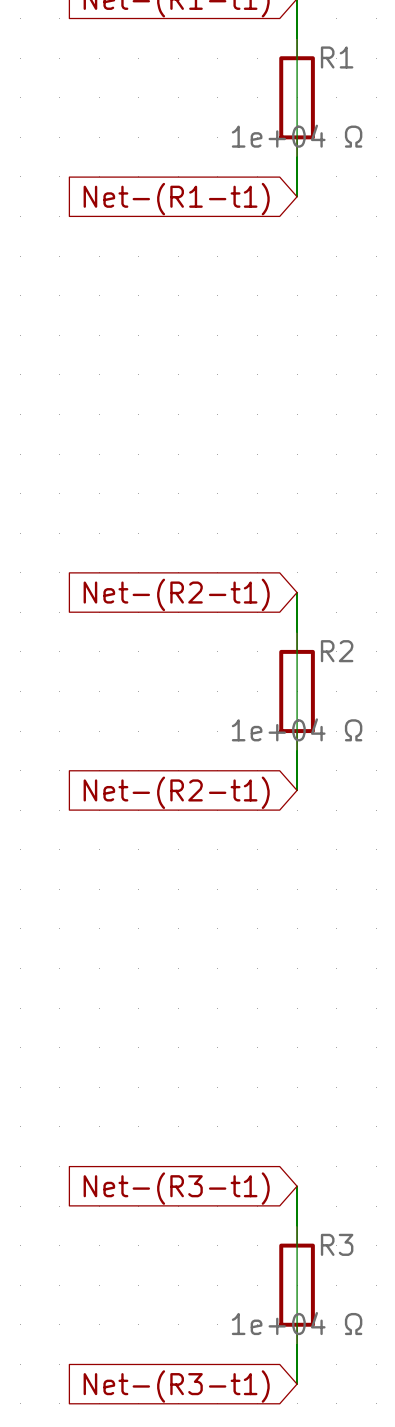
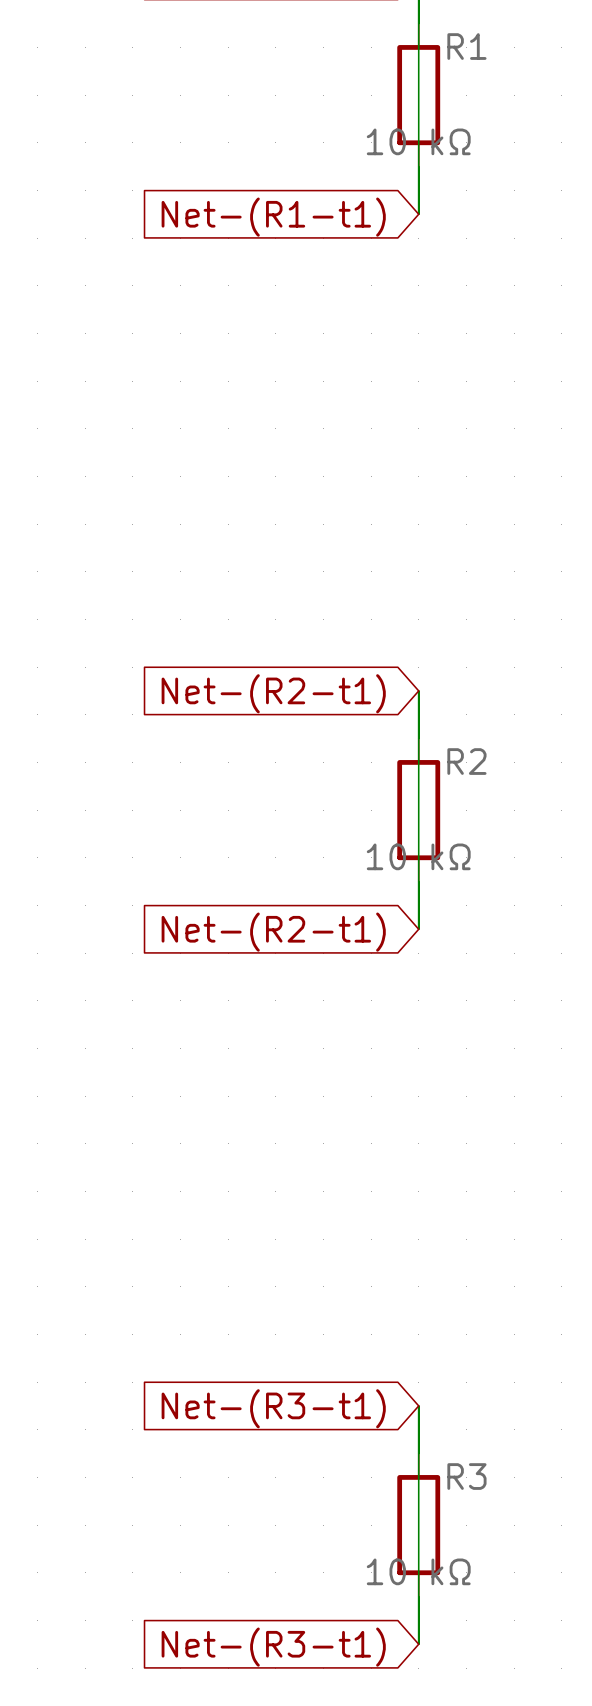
R1 value: 1e+04 Ω (297, 136) -> 10 kΩ (418, 141)
R2 value: 1e+04 Ω (297, 729) -> 10 kΩ (418, 856)
R3 value: 1e+04 Ω (297, 1323) -> 10 kΩ (418, 1571)

